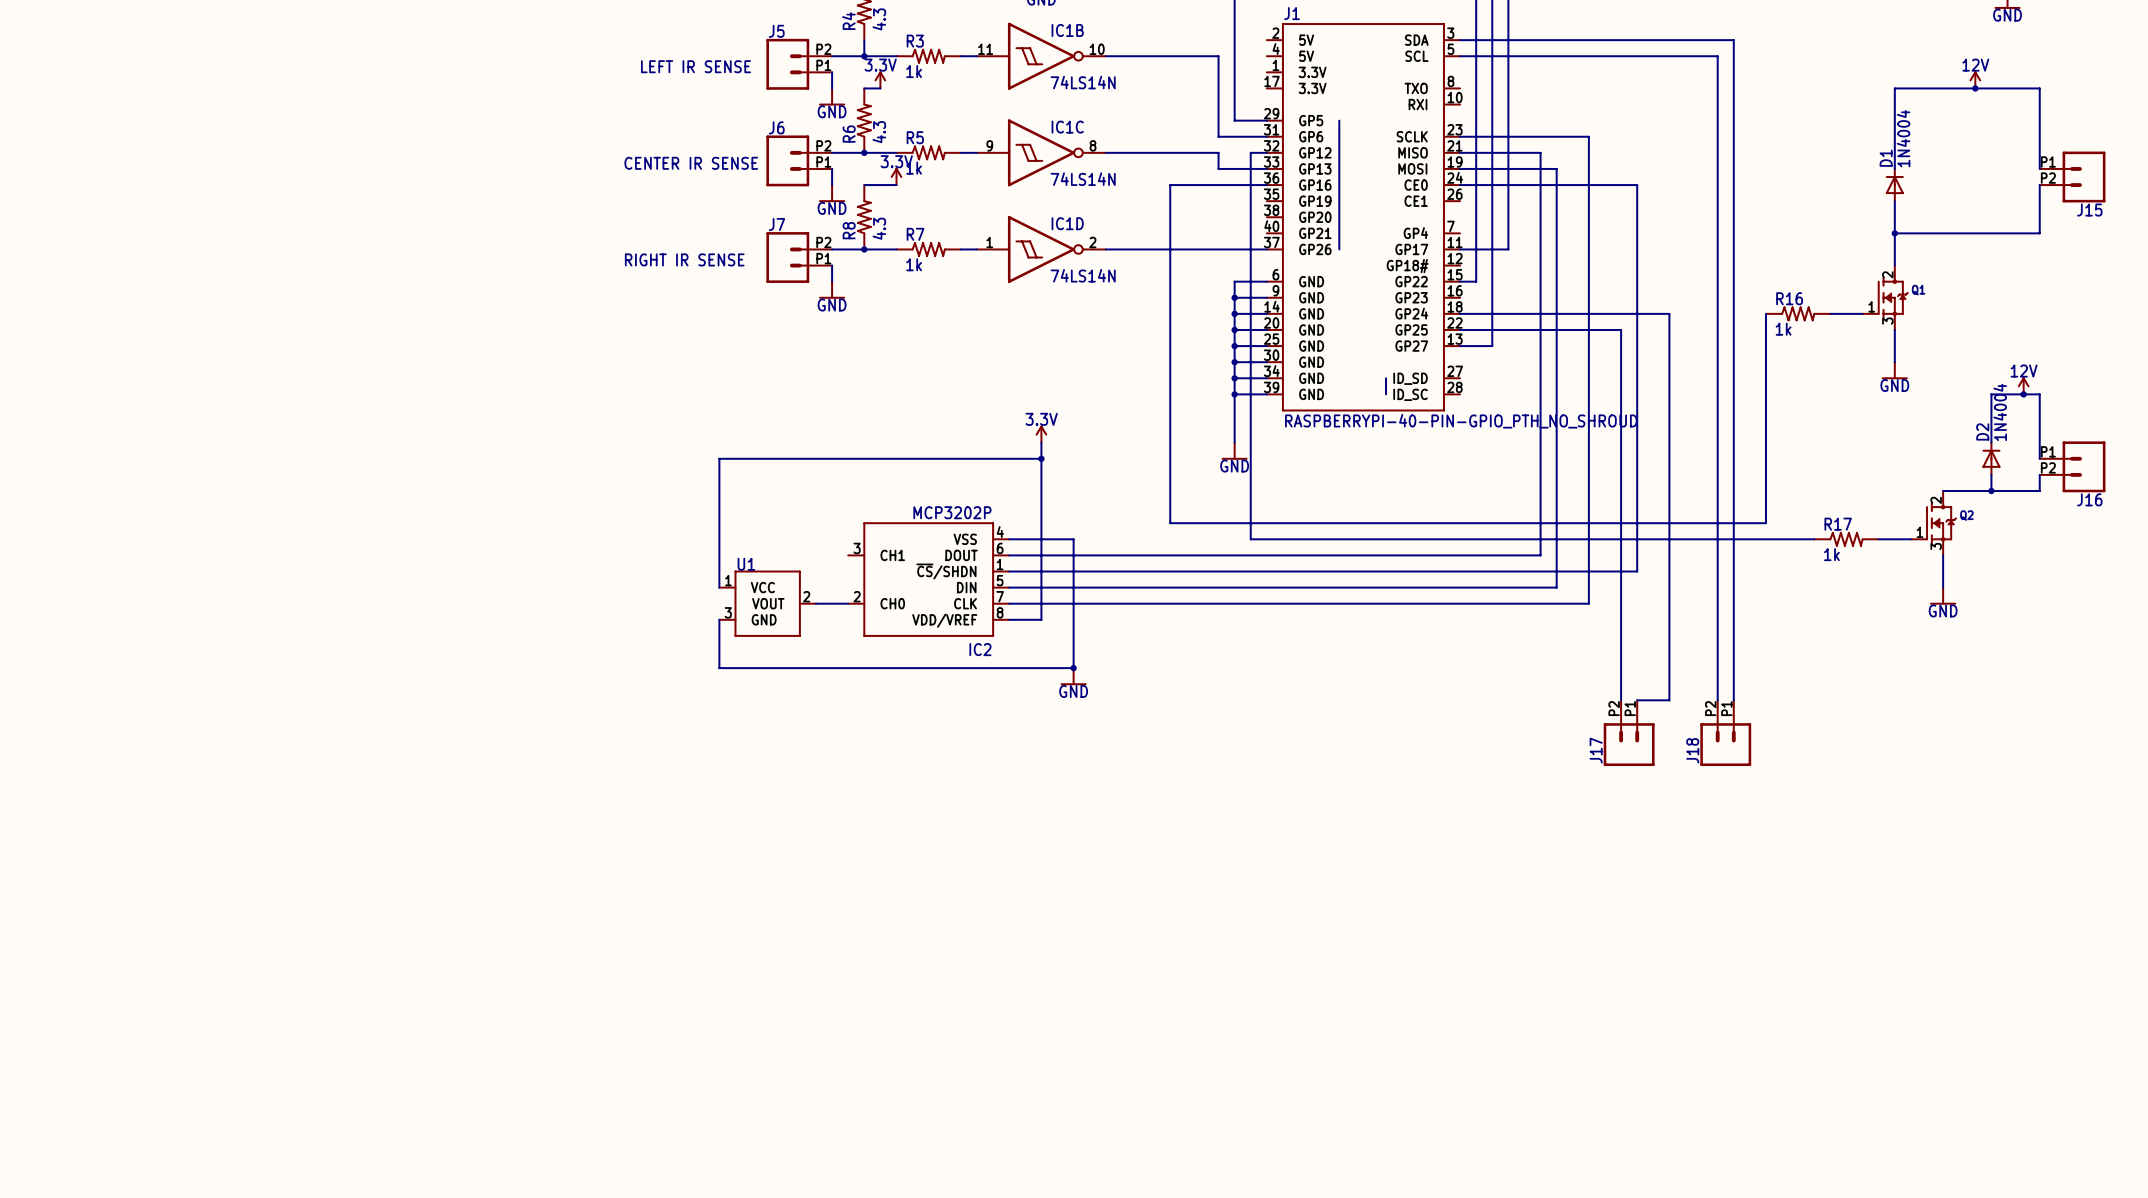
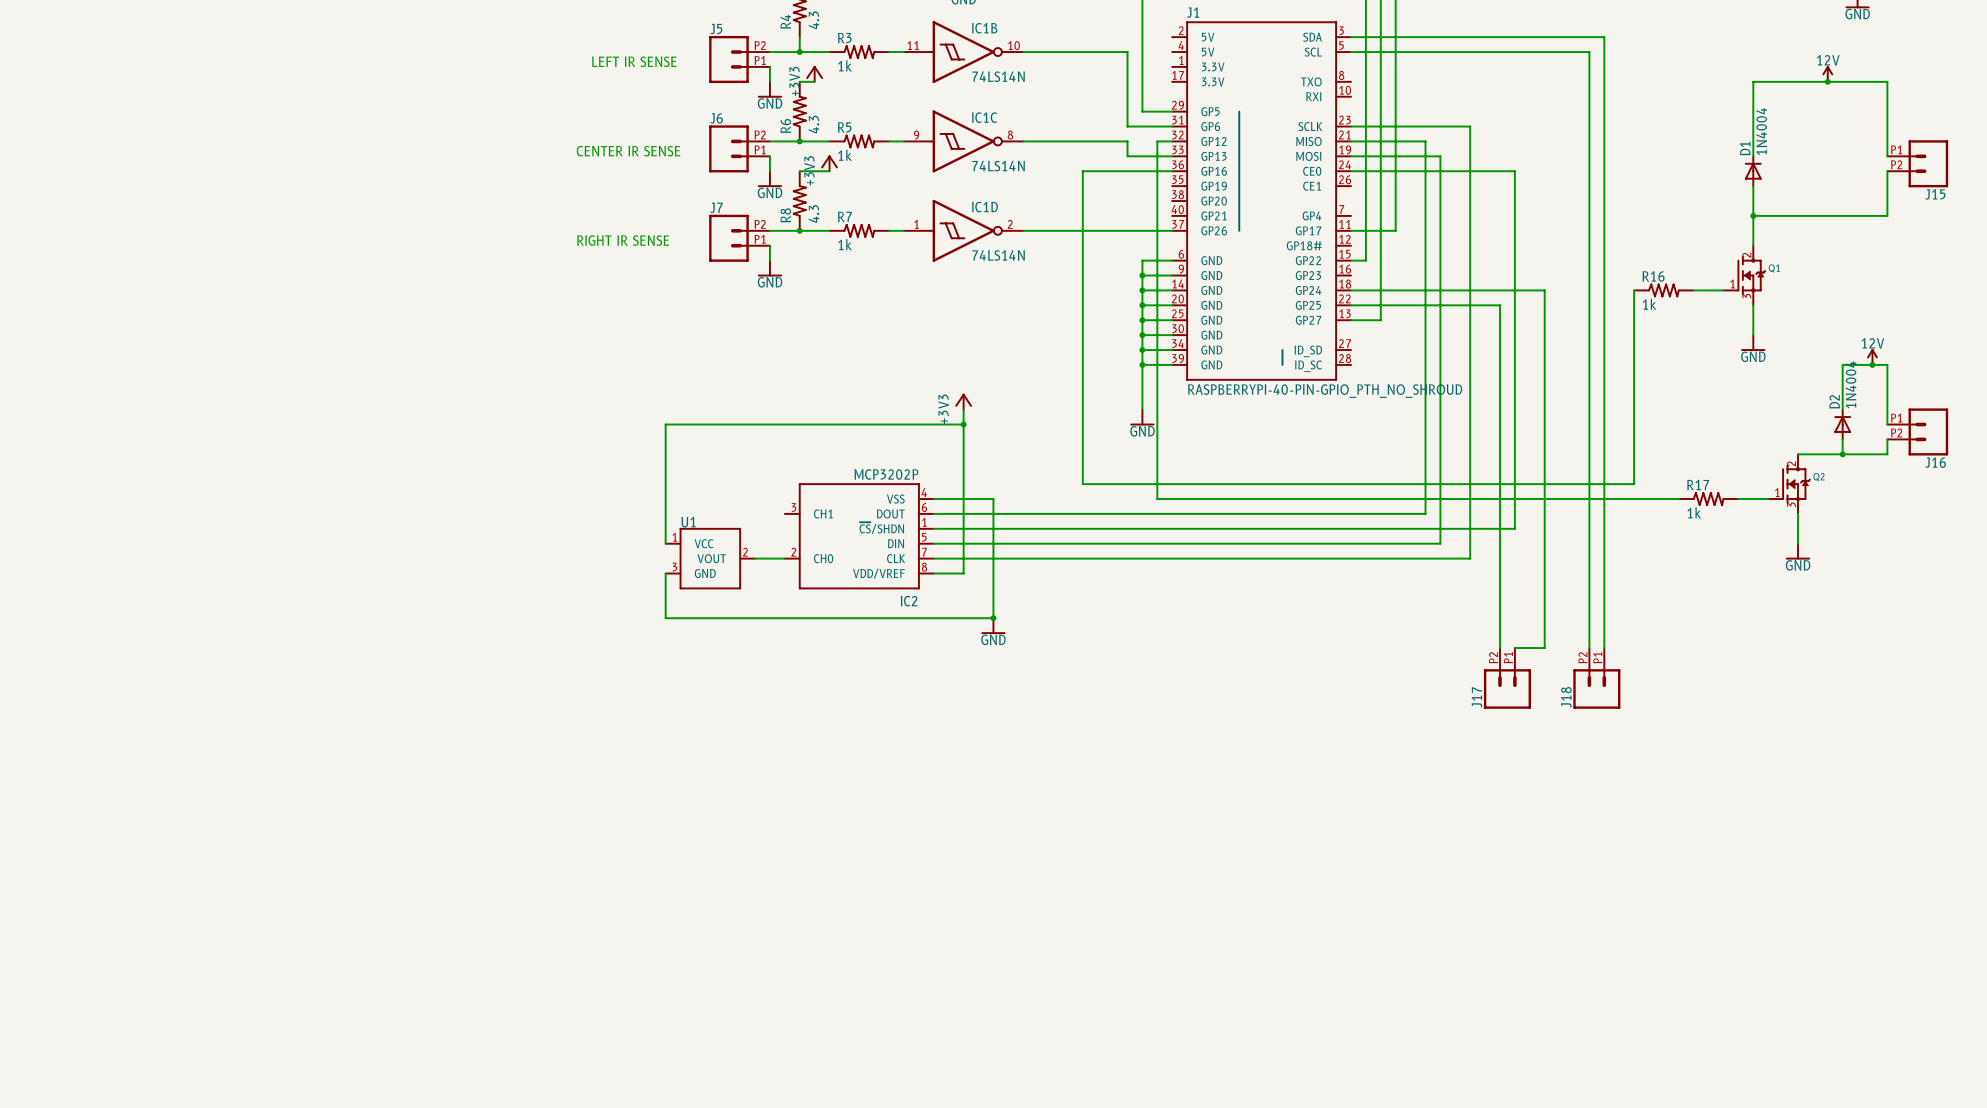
power symbol: 3.3V (880, 79) -> +3V3 (814, 74)
power symbol: 3.3V (896, 176) -> +3V3 (829, 163)
power symbol: 3.3V (1041, 434) -> +3V3 (963, 401)

